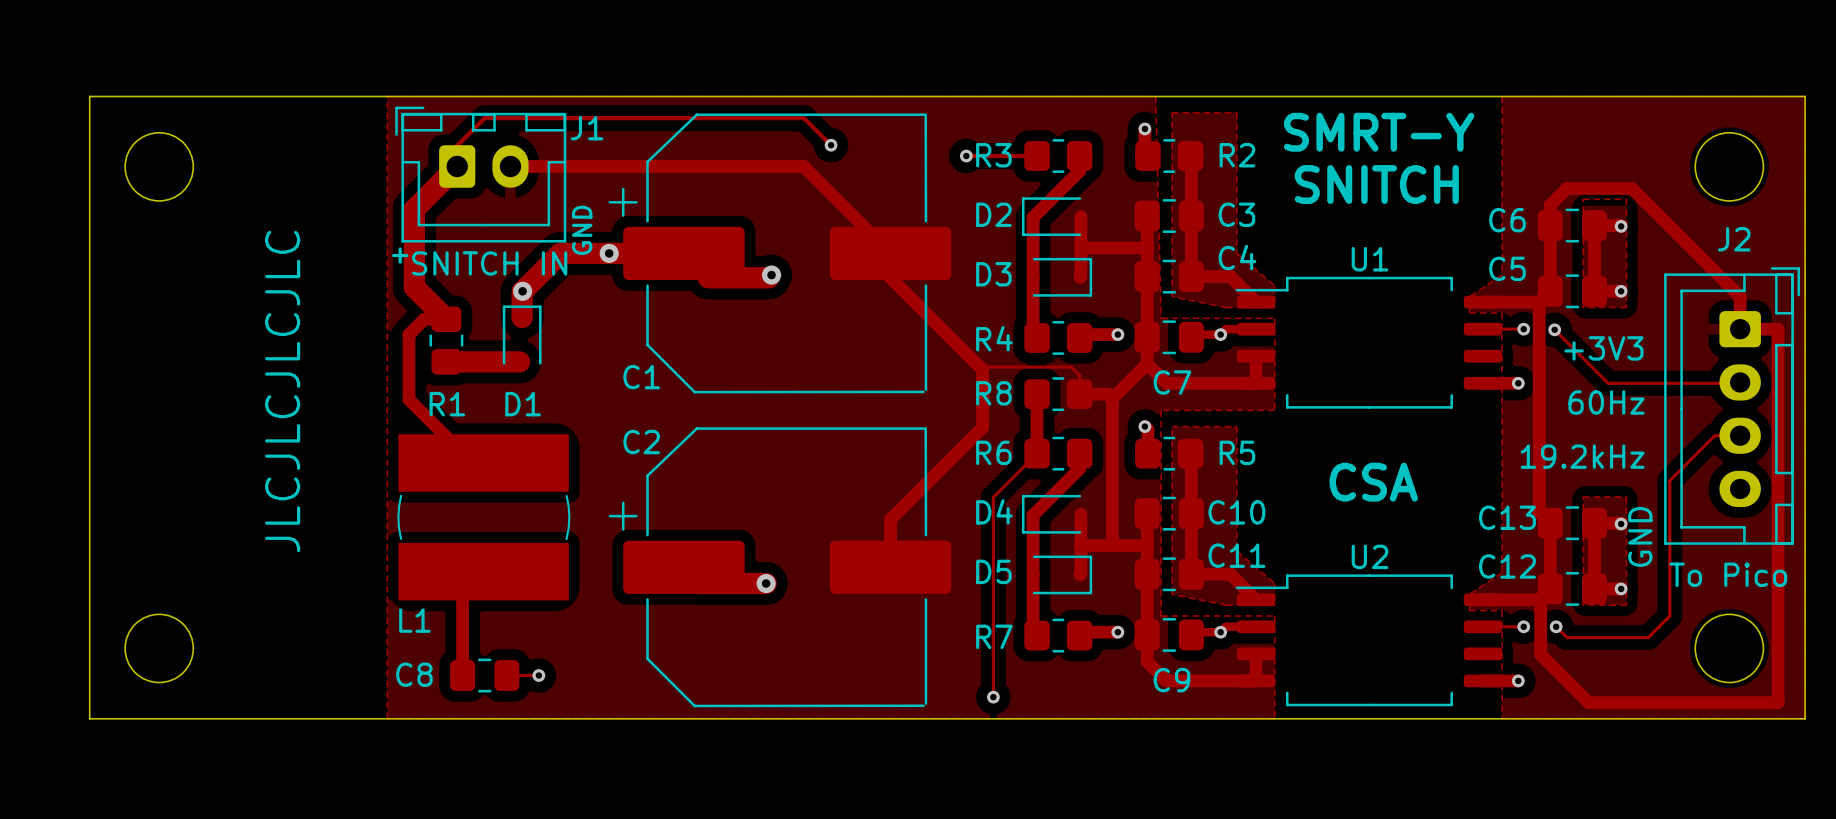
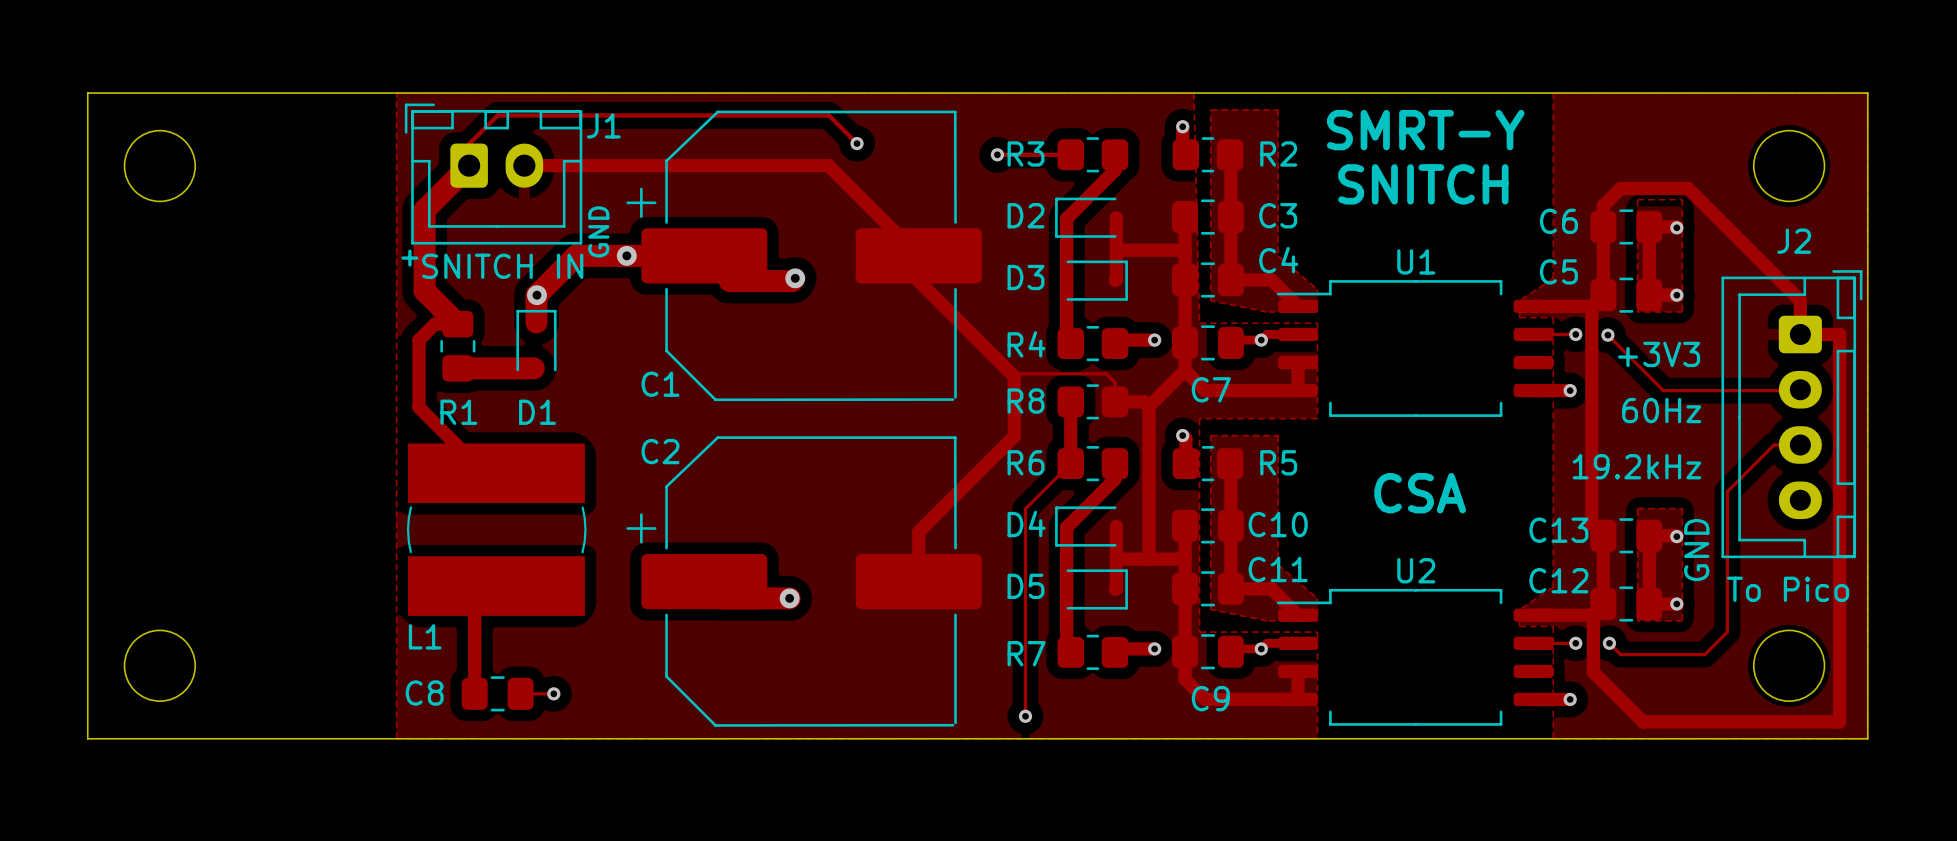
text: JLCJLCJLCJLC (282, 391) -> none

